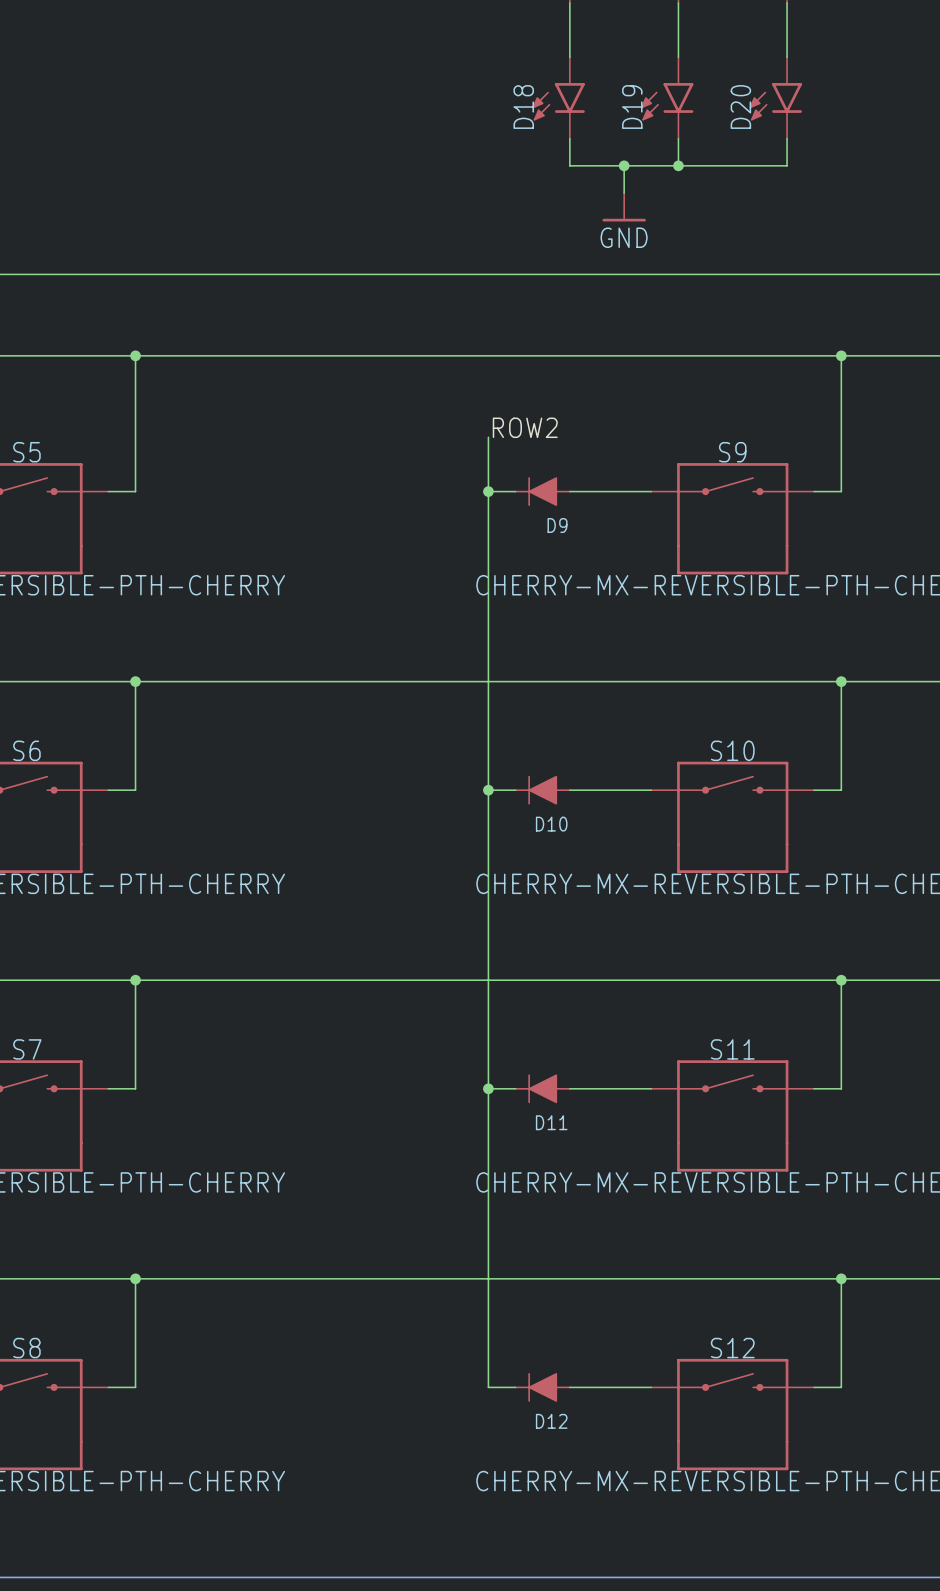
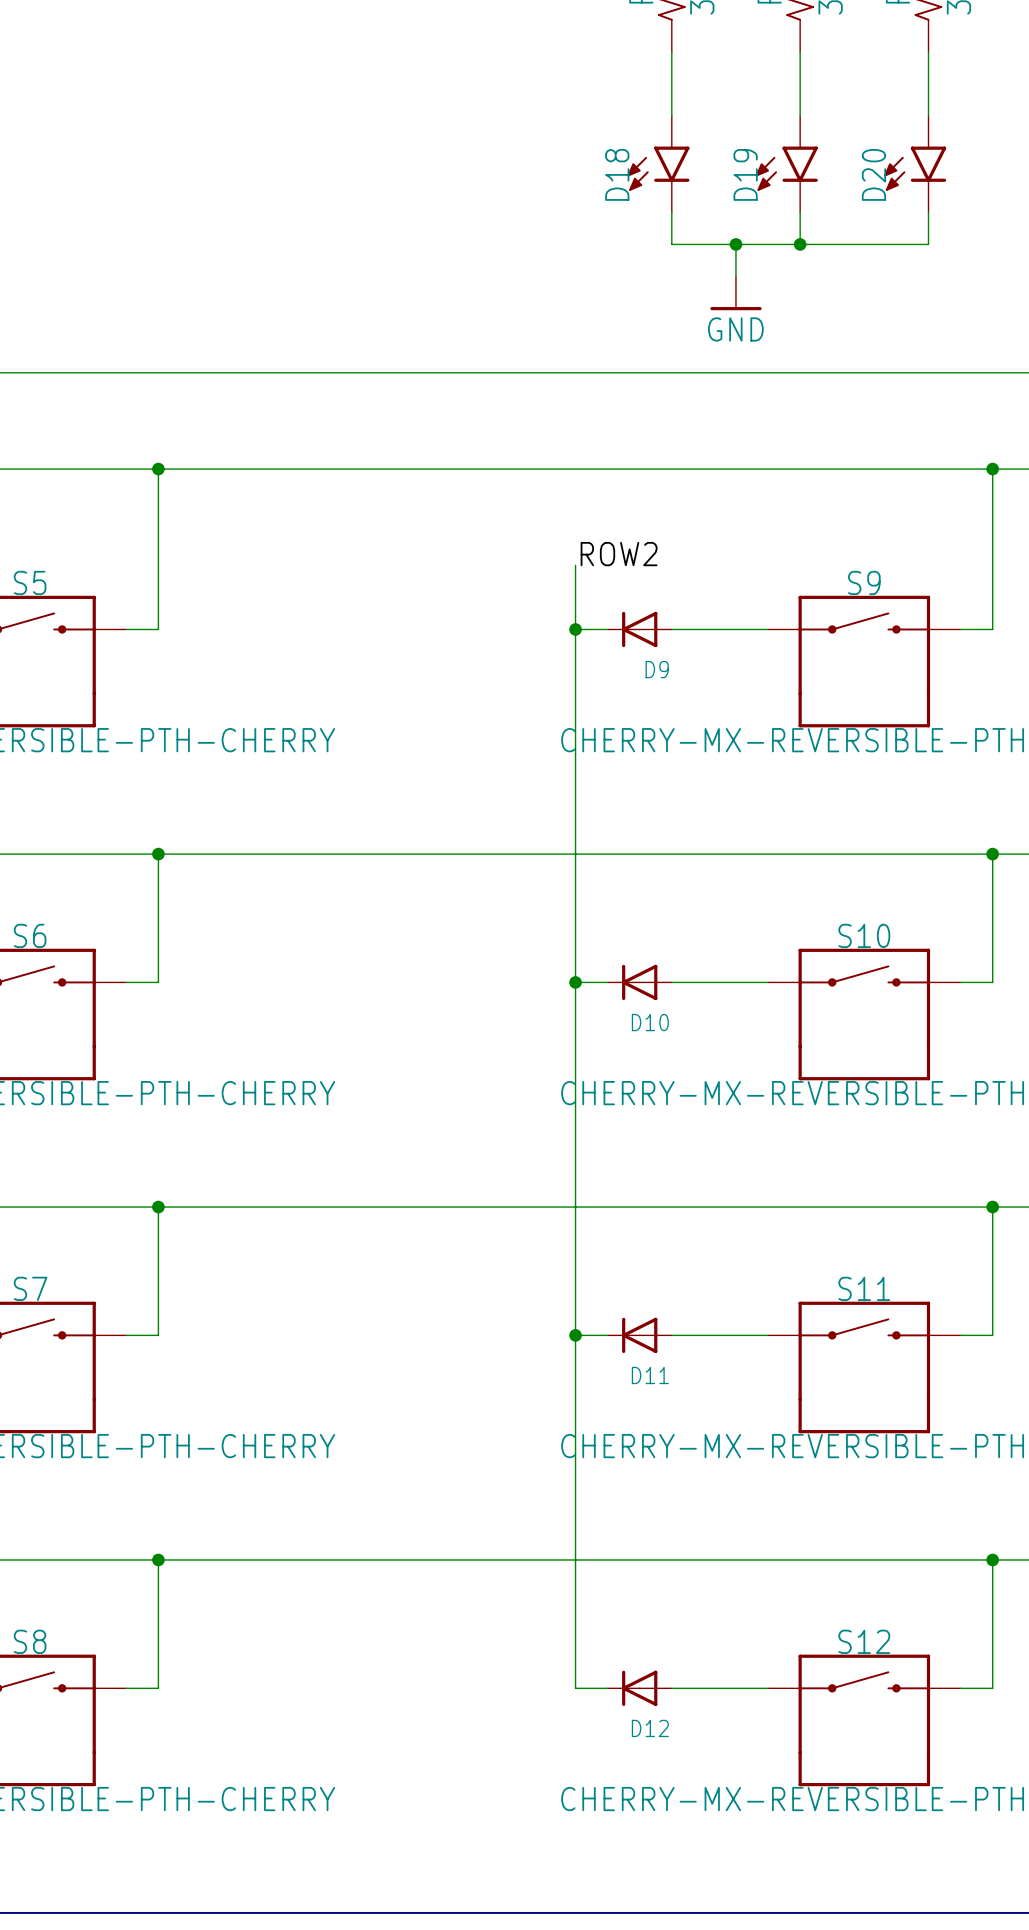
D9 symbol: [514, 477, 571, 506] -> [607, 611, 672, 648]
D10 symbol: [514, 775, 571, 805] -> [607, 964, 672, 1001]
D11 symbol: [514, 1074, 571, 1104] -> [607, 1317, 672, 1354]
D12 symbol: [514, 1373, 571, 1402] -> [607, 1670, 672, 1706]

